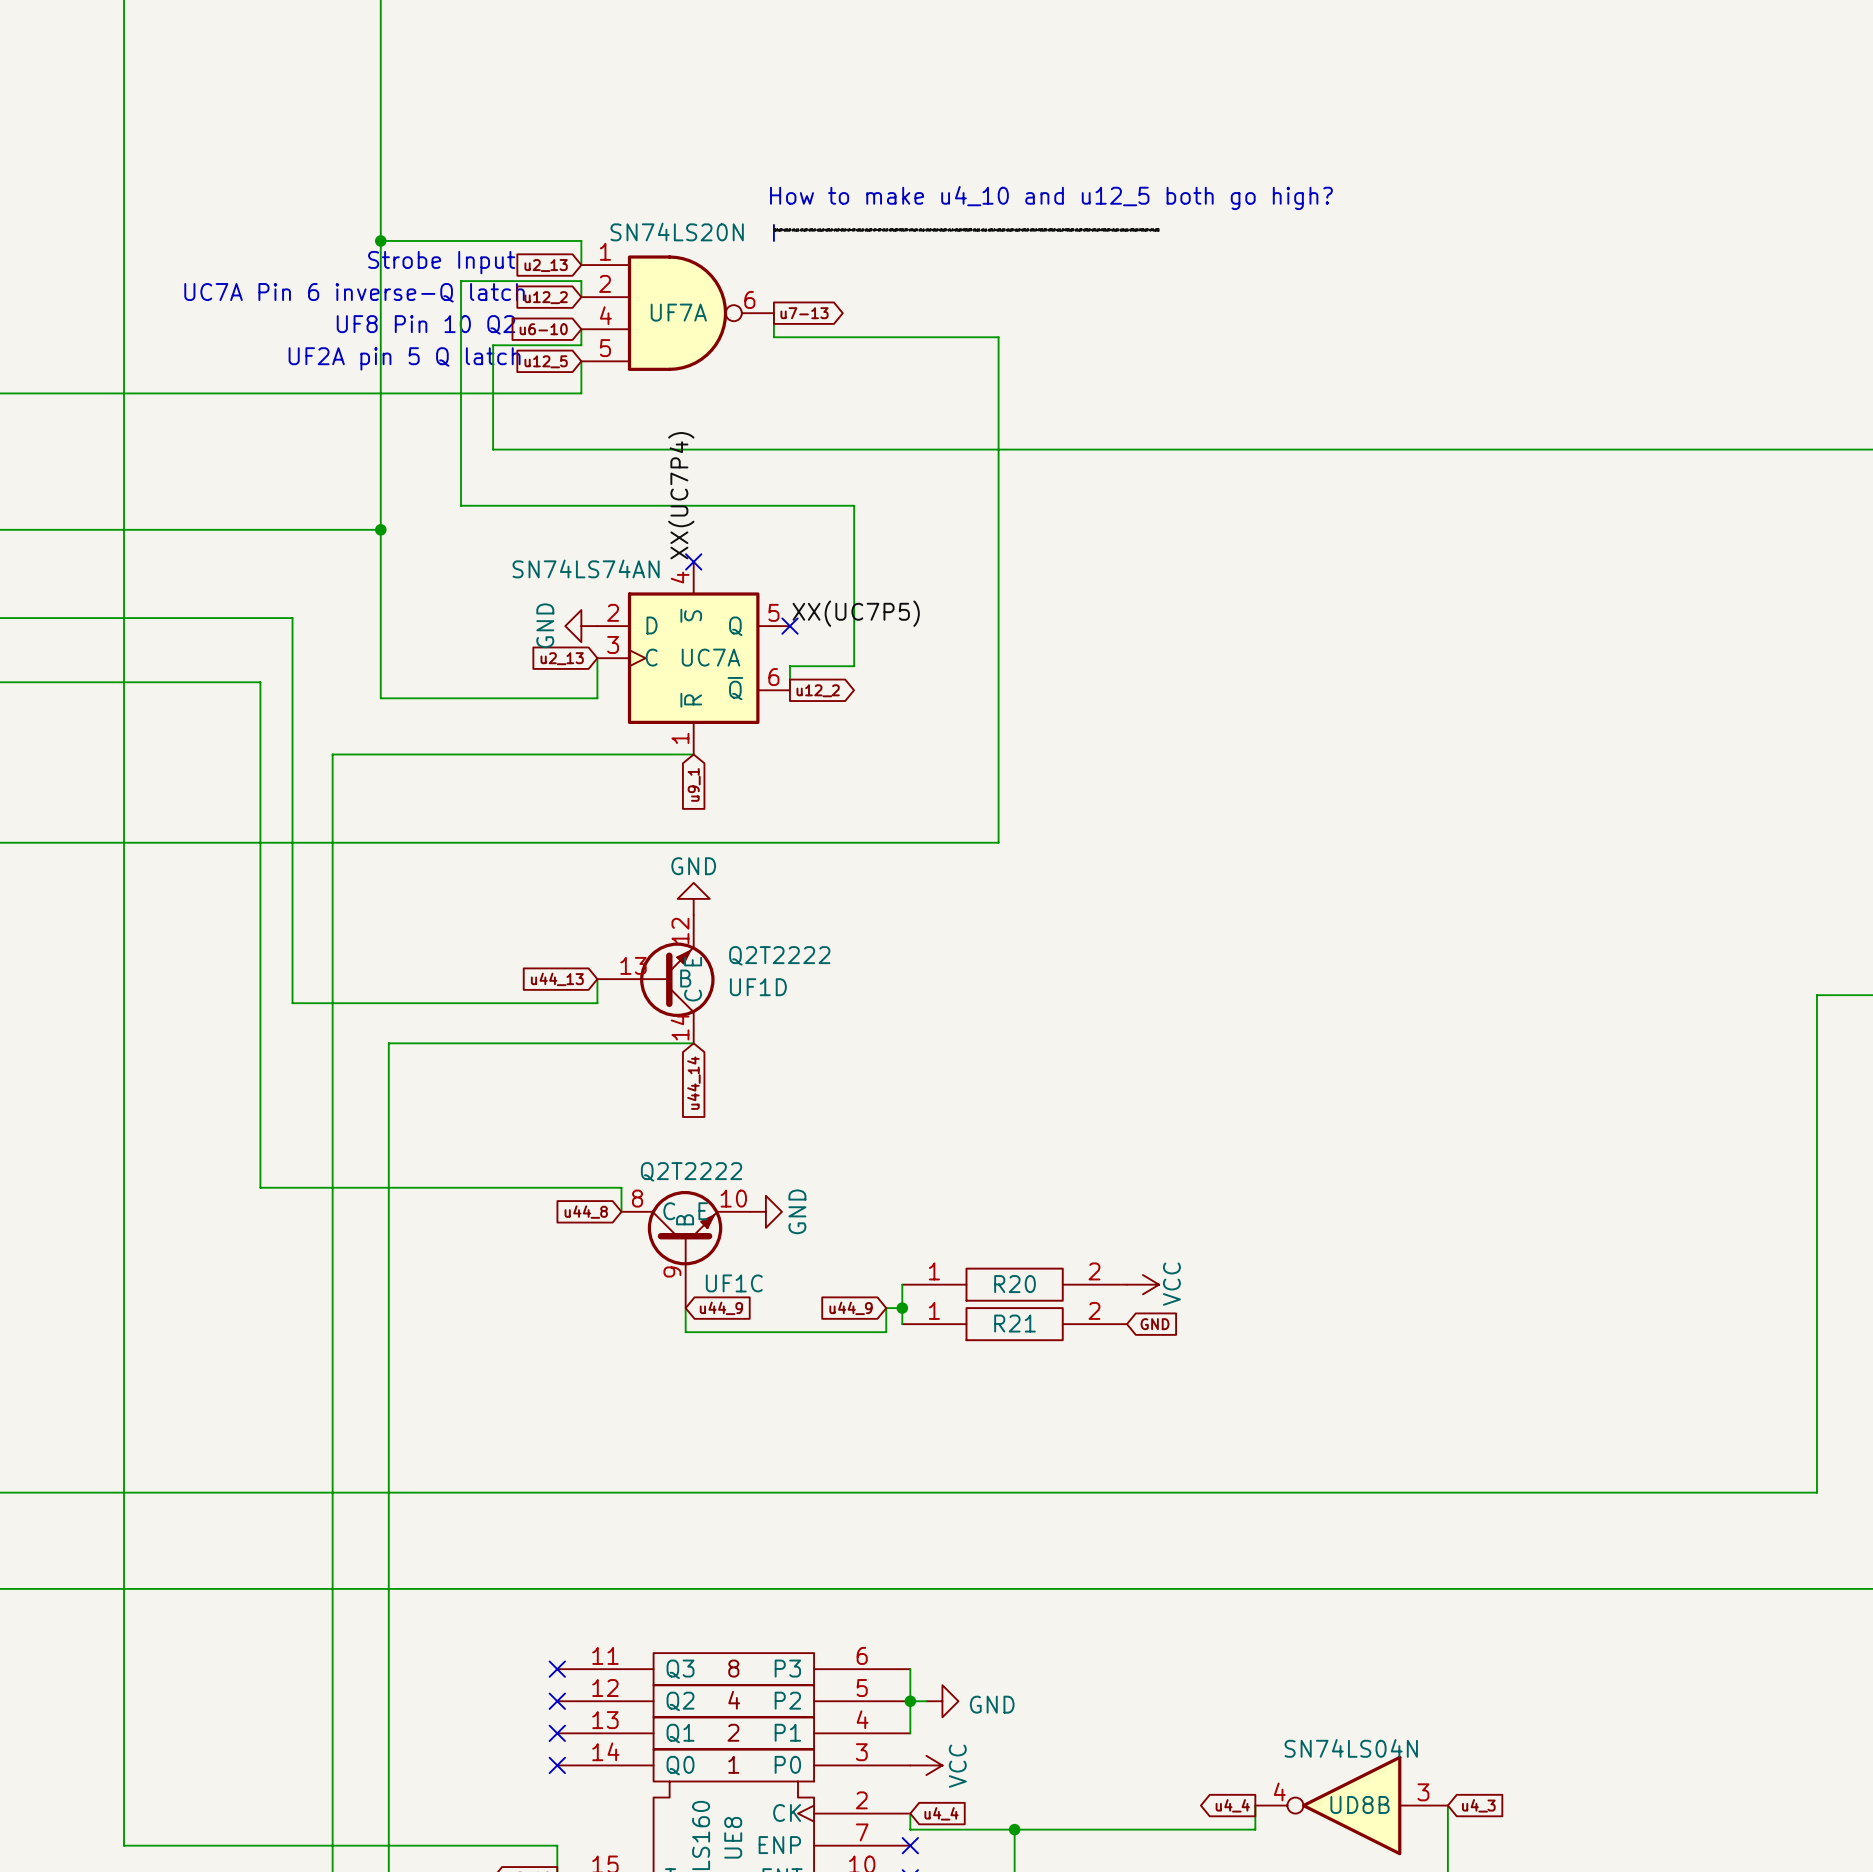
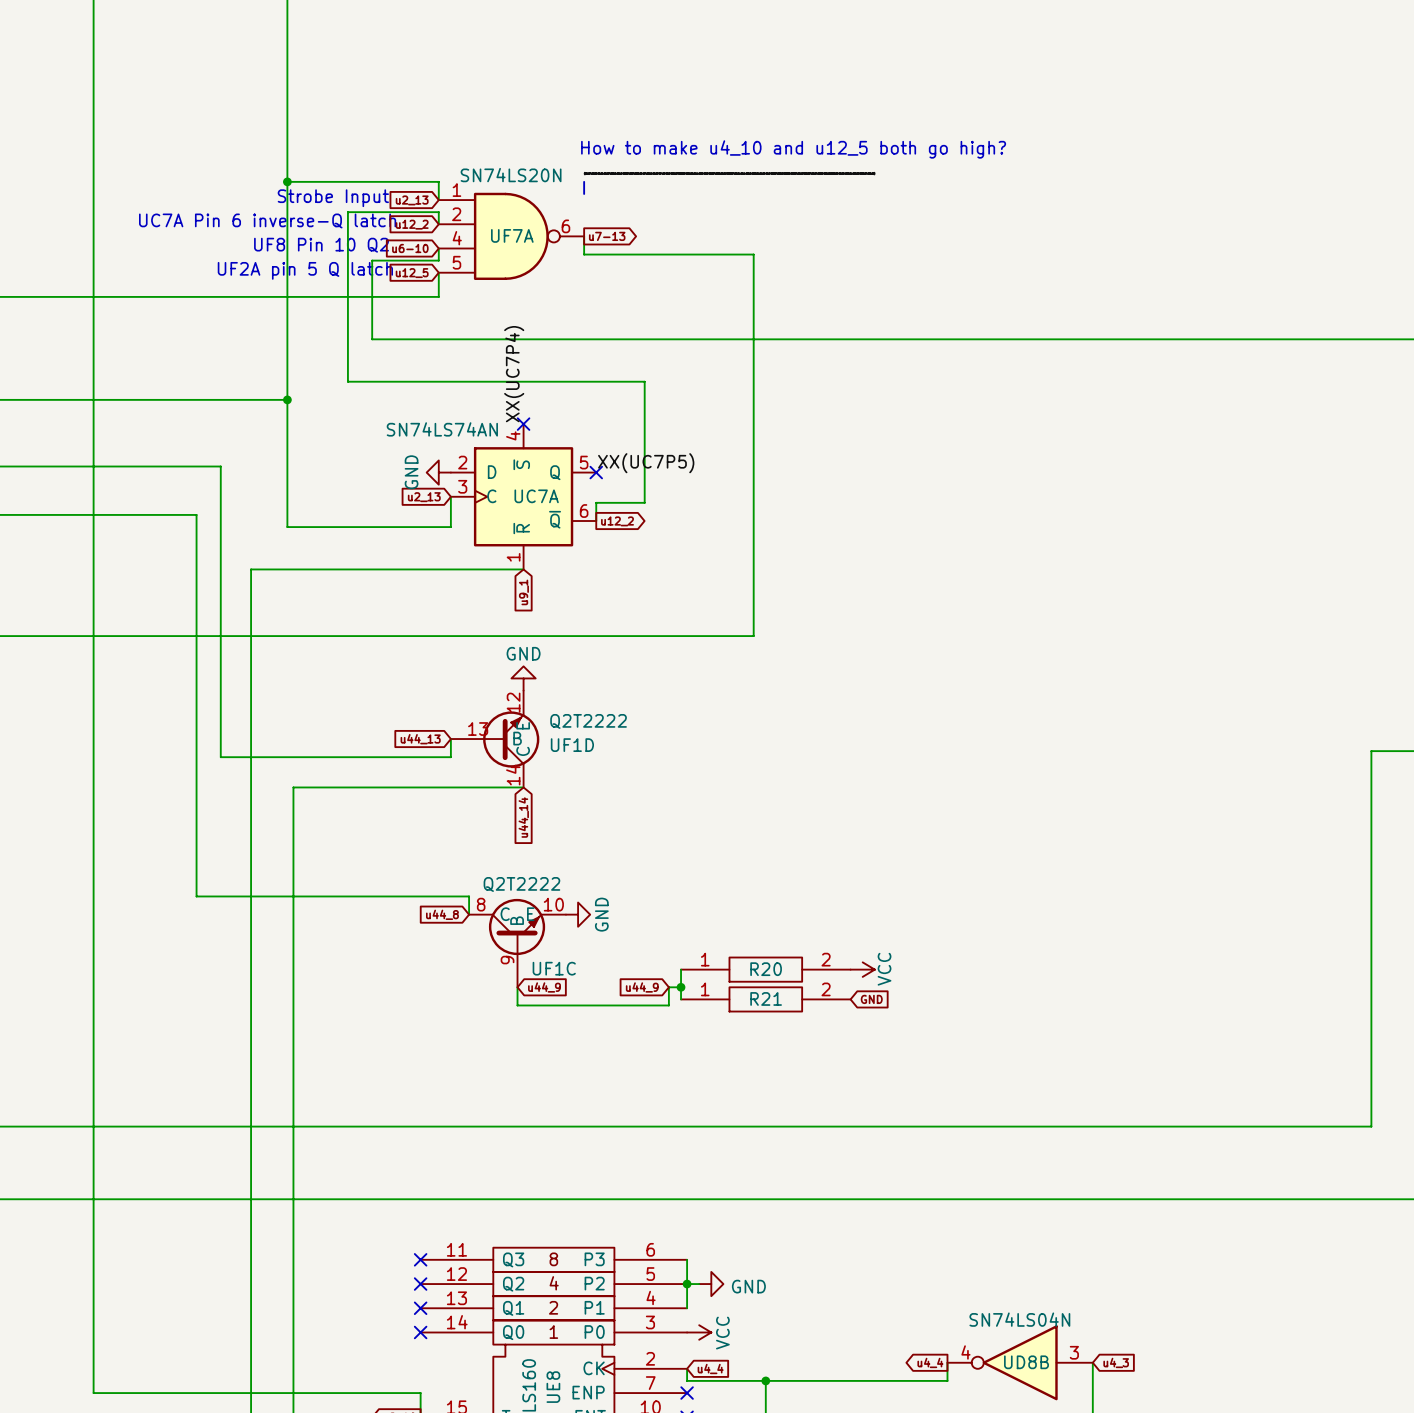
bus: (773, 224) (773, 240) -> (584, 193) (584, 181)

